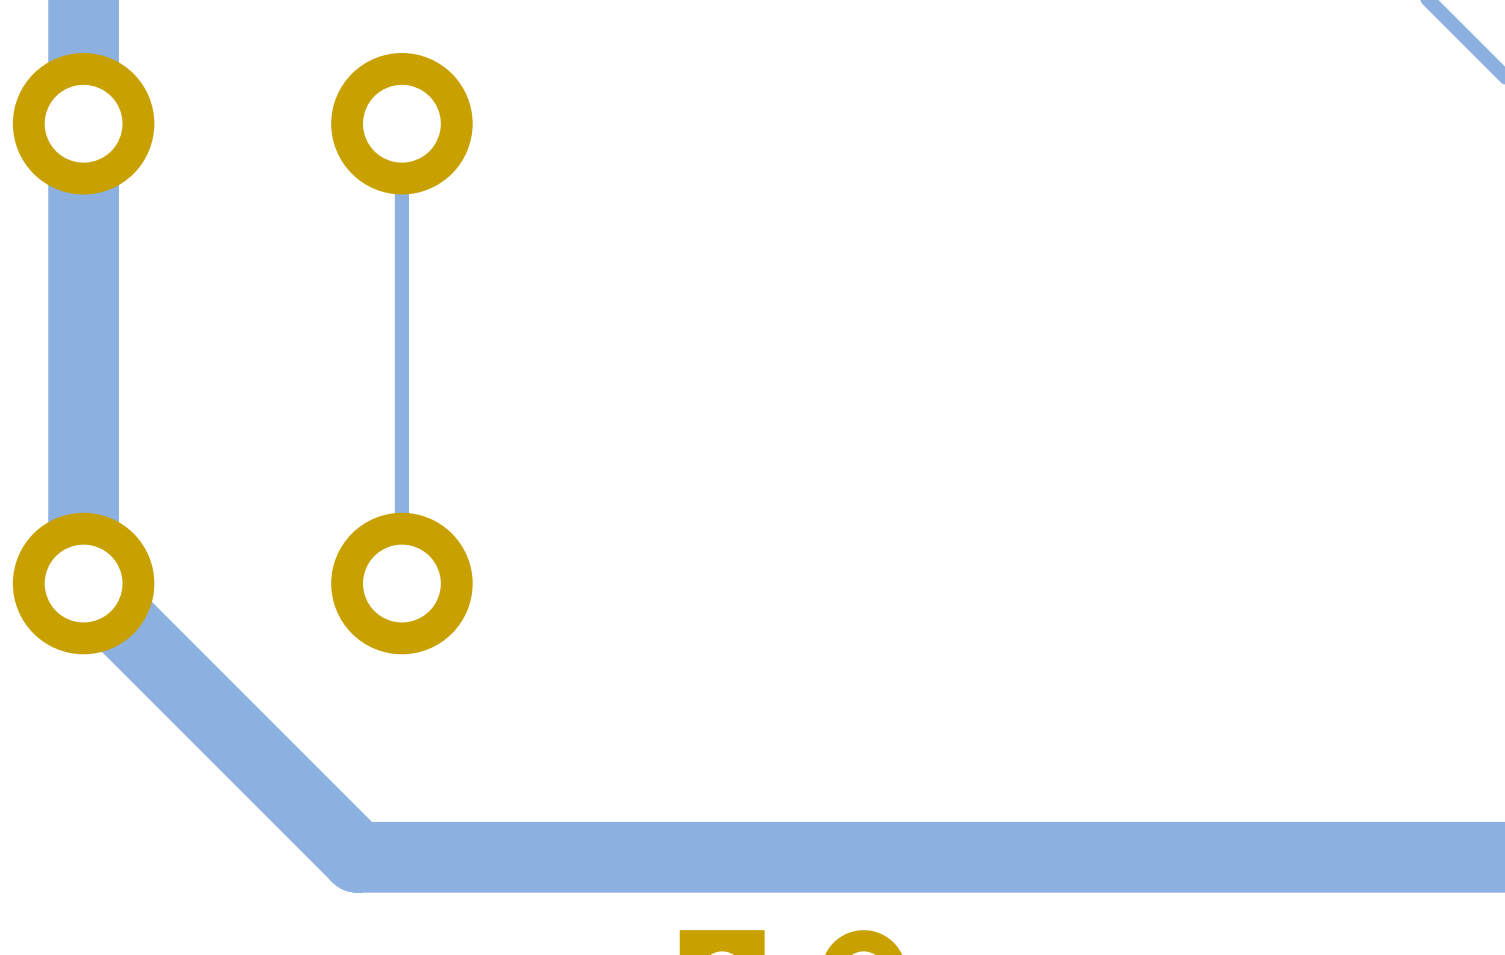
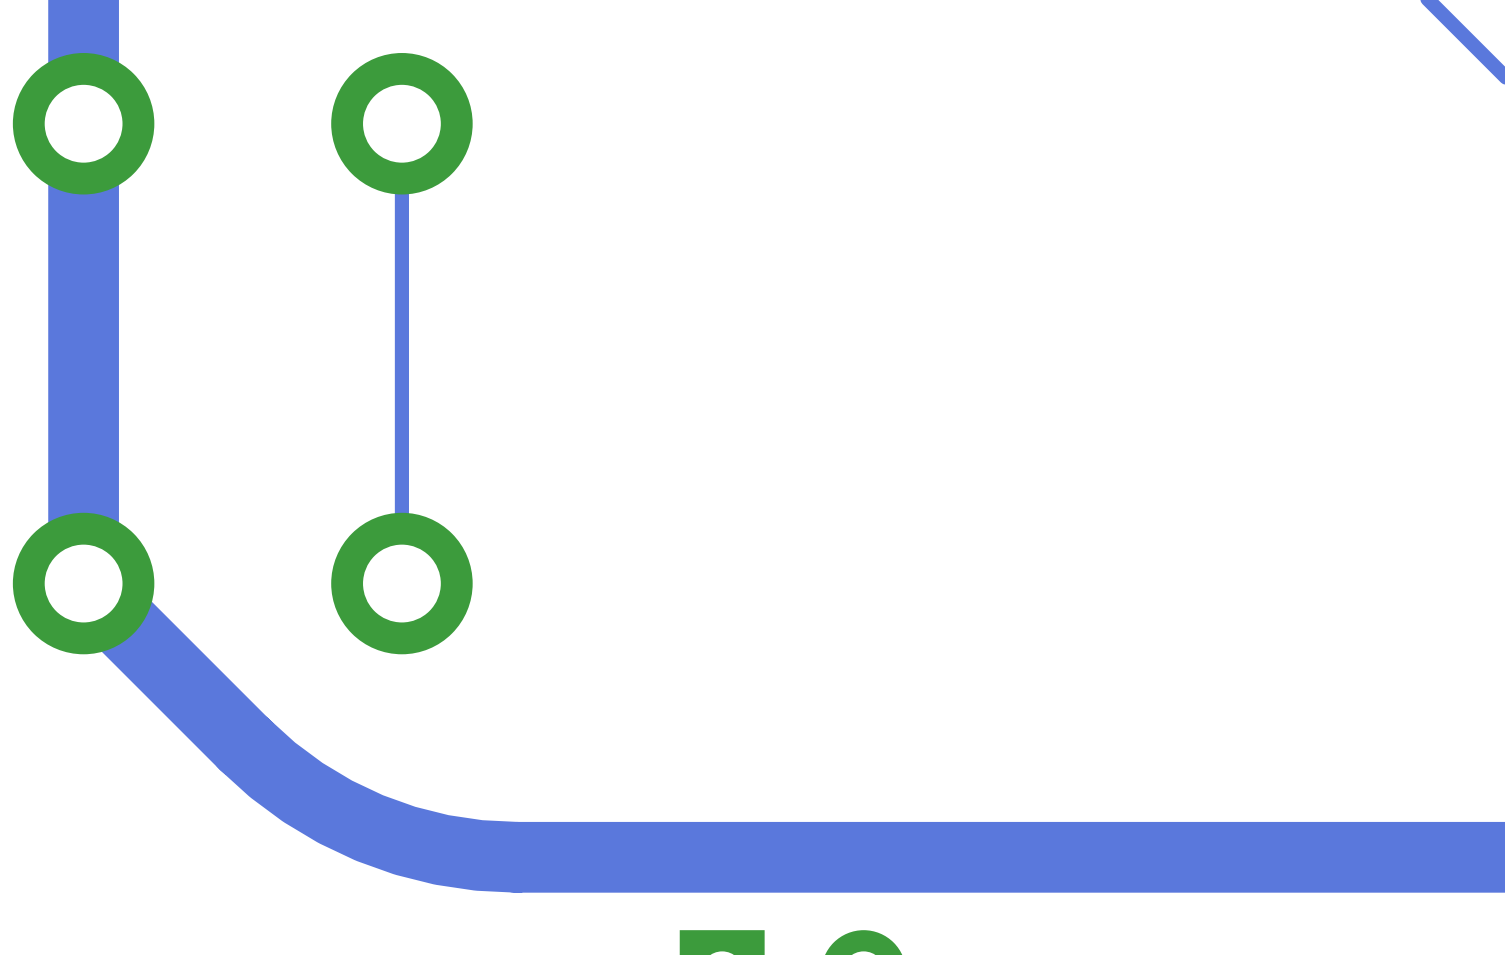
track: (244, 744) (357, 857) (516, 857) -> (244, 744) (272, 769) (302, 792) (335, 811) (369, 828) (405, 840) (441, 849) (479, 855) (516, 857)

